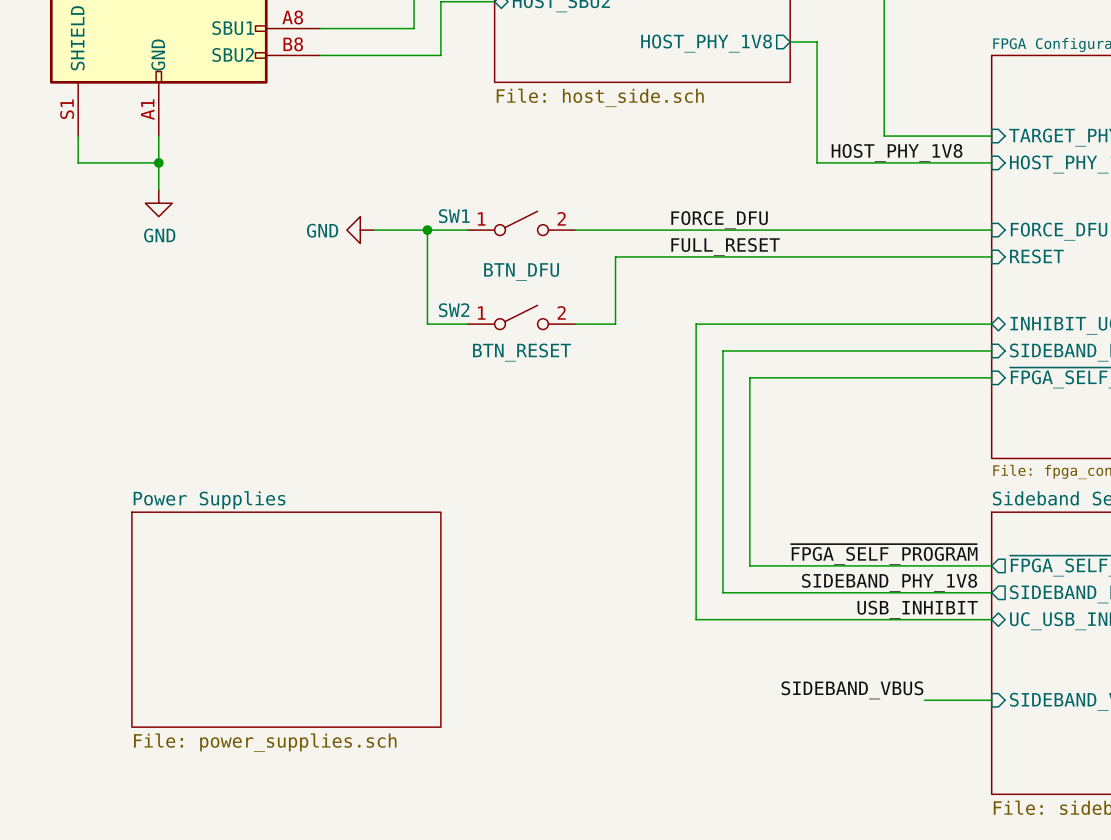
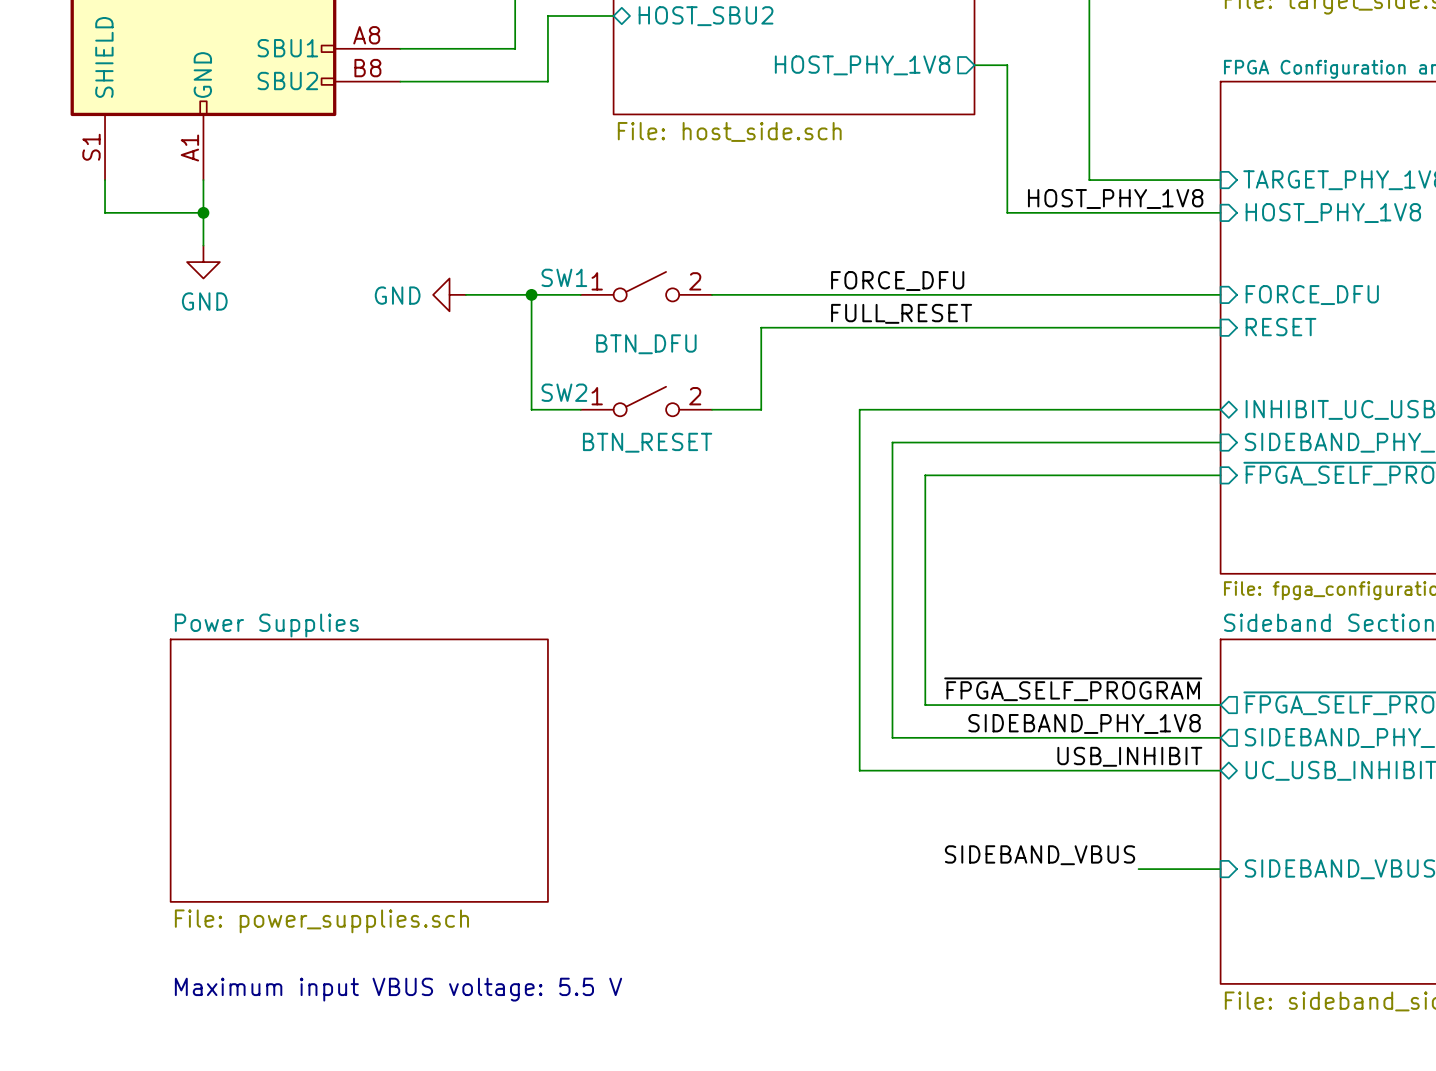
text: none -> Maximum input VBUS voltage: 5.5 V (398, 989)

